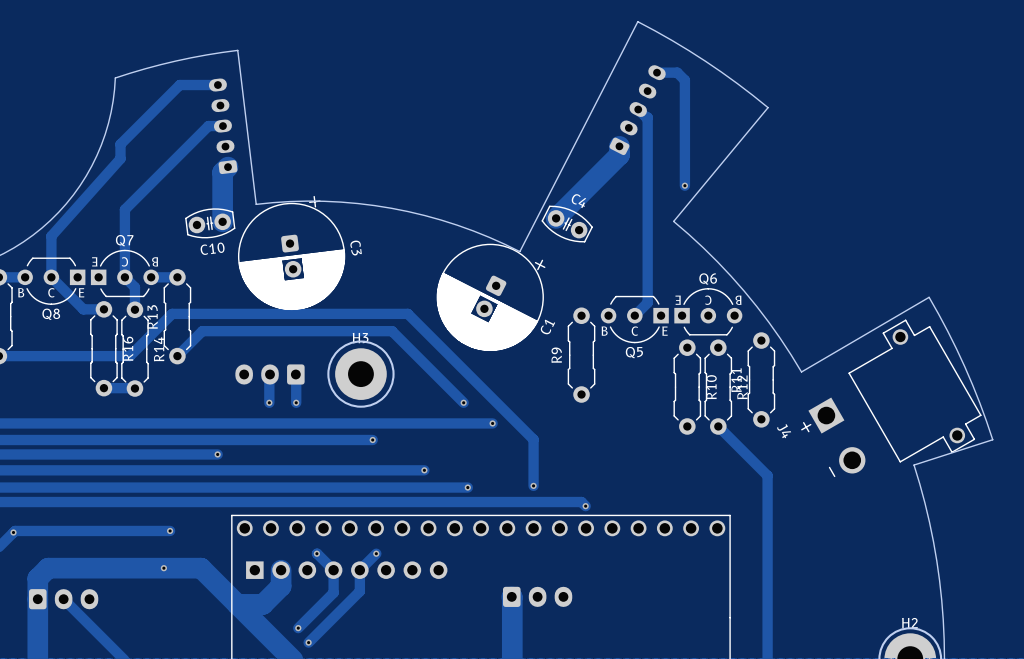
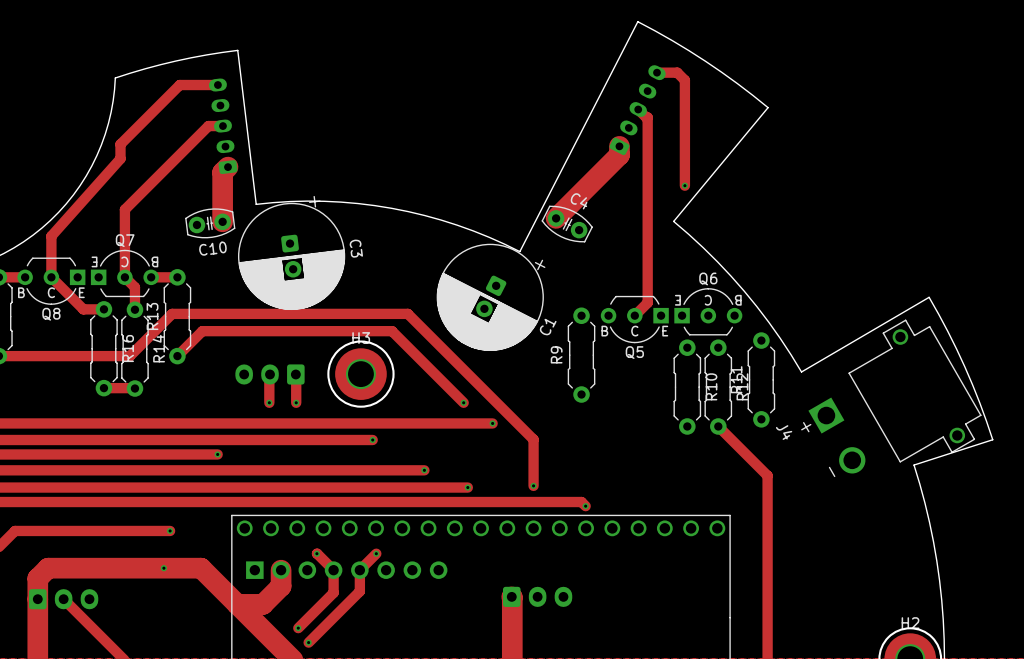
via: (13, 532) -> none

